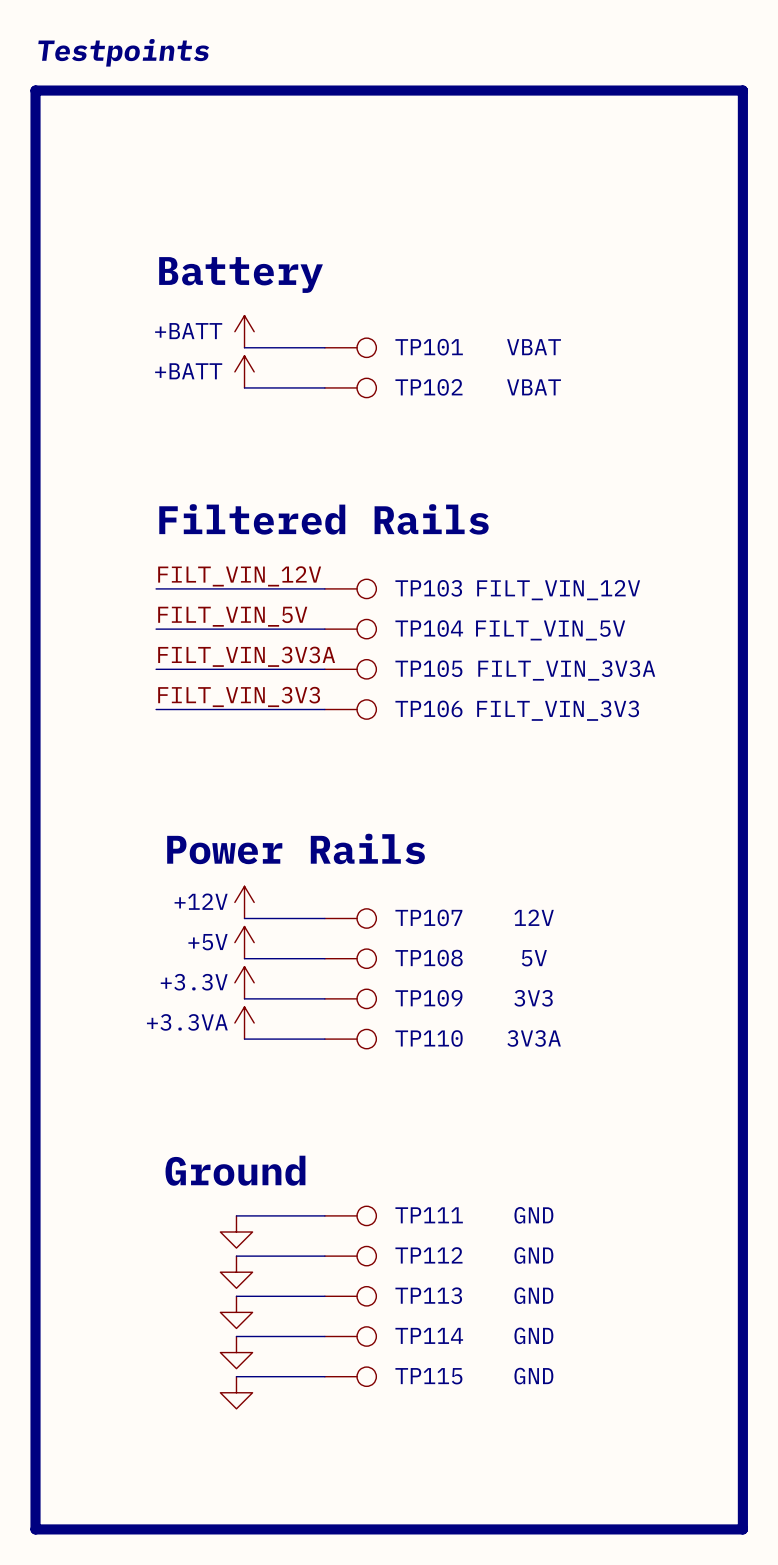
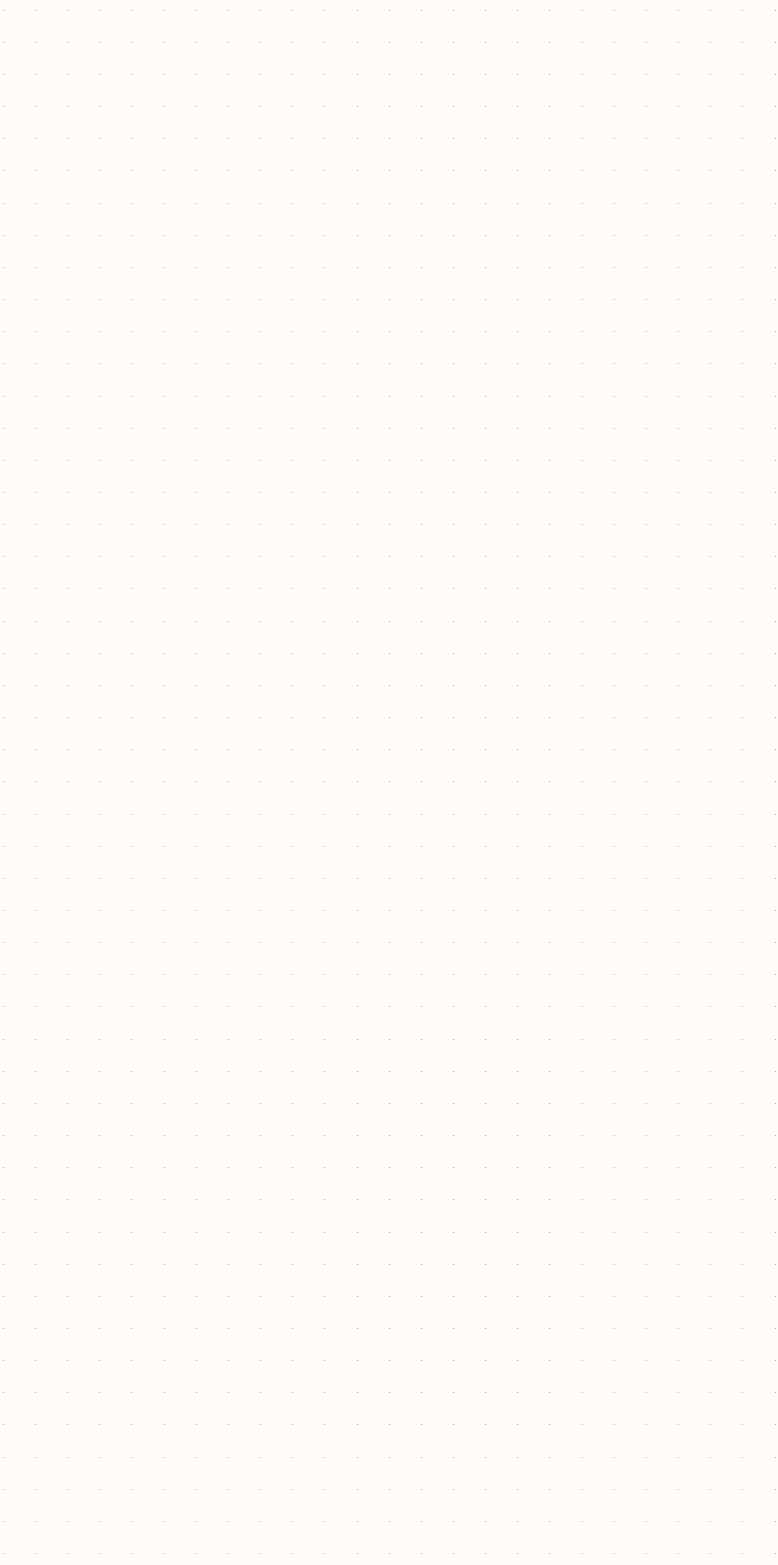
text: Testpoints (123, 52) -> none
line: (35, 90) (742, 90) (742, 1529) (35, 1529) (35, 90) -> none
text: Battery (241, 275) -> none
power symbol: +BATT (244, 331) -> none
wire: (244, 347) (324, 347) -> none
TP101: VBAT (350, 347) -> none
power symbol: +BATT (244, 371) -> none
wire: (244, 387) (324, 387) -> none
TP102: VBAT (350, 387) -> none
text: Filtered Rails (323, 519) -> none
label: FILT_VIN_12V (239, 576) -> none
wire: (156, 588) (324, 588) -> none
TP103: FILT_VIN_12V (350, 588) -> none
label: FILT_VIN_5V (232, 616) -> none
wire: (156, 629) (324, 629) -> none
TP104: FILT_VIN_5V (350, 629) -> none
label: FILT_VIN_3V3A (246, 656) -> none
wire: (156, 669) (324, 669) -> none
TP105: FILT_VIN_3V3A (350, 669) -> none
label: FILT_VIN_3V3 (239, 696) -> none
wire: (156, 709) (324, 709) -> none
TP106: FILT_VIN_3V3 (350, 709) -> none
text: Power Rails (296, 848) -> none
power symbol: +12V (244, 902) -> none
wire: (244, 918) (324, 918) -> none
TP107: 12V (350, 918) -> none
power symbol: +5V (244, 942) -> none
wire: (244, 958) (324, 958) -> none
TP108: 5V (350, 958) -> none
power symbol: +3.3V (244, 982) -> none
wire: (244, 998) (324, 998) -> none
TP109: 3V3 (350, 998) -> none
power symbol: +3.3VA (244, 1023) -> none
wire: (244, 1039) (324, 1039) -> none
TP110: 3V3A (350, 1039) -> none
text: Ground (235, 1170) -> none
wire: (236, 1215) (324, 1215) -> none
TP111: GND (350, 1215) -> none
power symbol: (236, 1232) -> none
wire: (236, 1256) (324, 1256) -> none
TP112: GND (350, 1256) -> none
power symbol: (236, 1272) -> none
wire: (236, 1296) (324, 1296) -> none
TP113: GND (350, 1296) -> none
power symbol: (236, 1312) -> none
wire: (236, 1336) (324, 1336) -> none
TP114: GND (350, 1336) -> none
power symbol: (236, 1352) -> none
wire: (236, 1376) (324, 1376) -> none
TP115: GND (350, 1376) -> none
power symbol: (236, 1392) -> none

